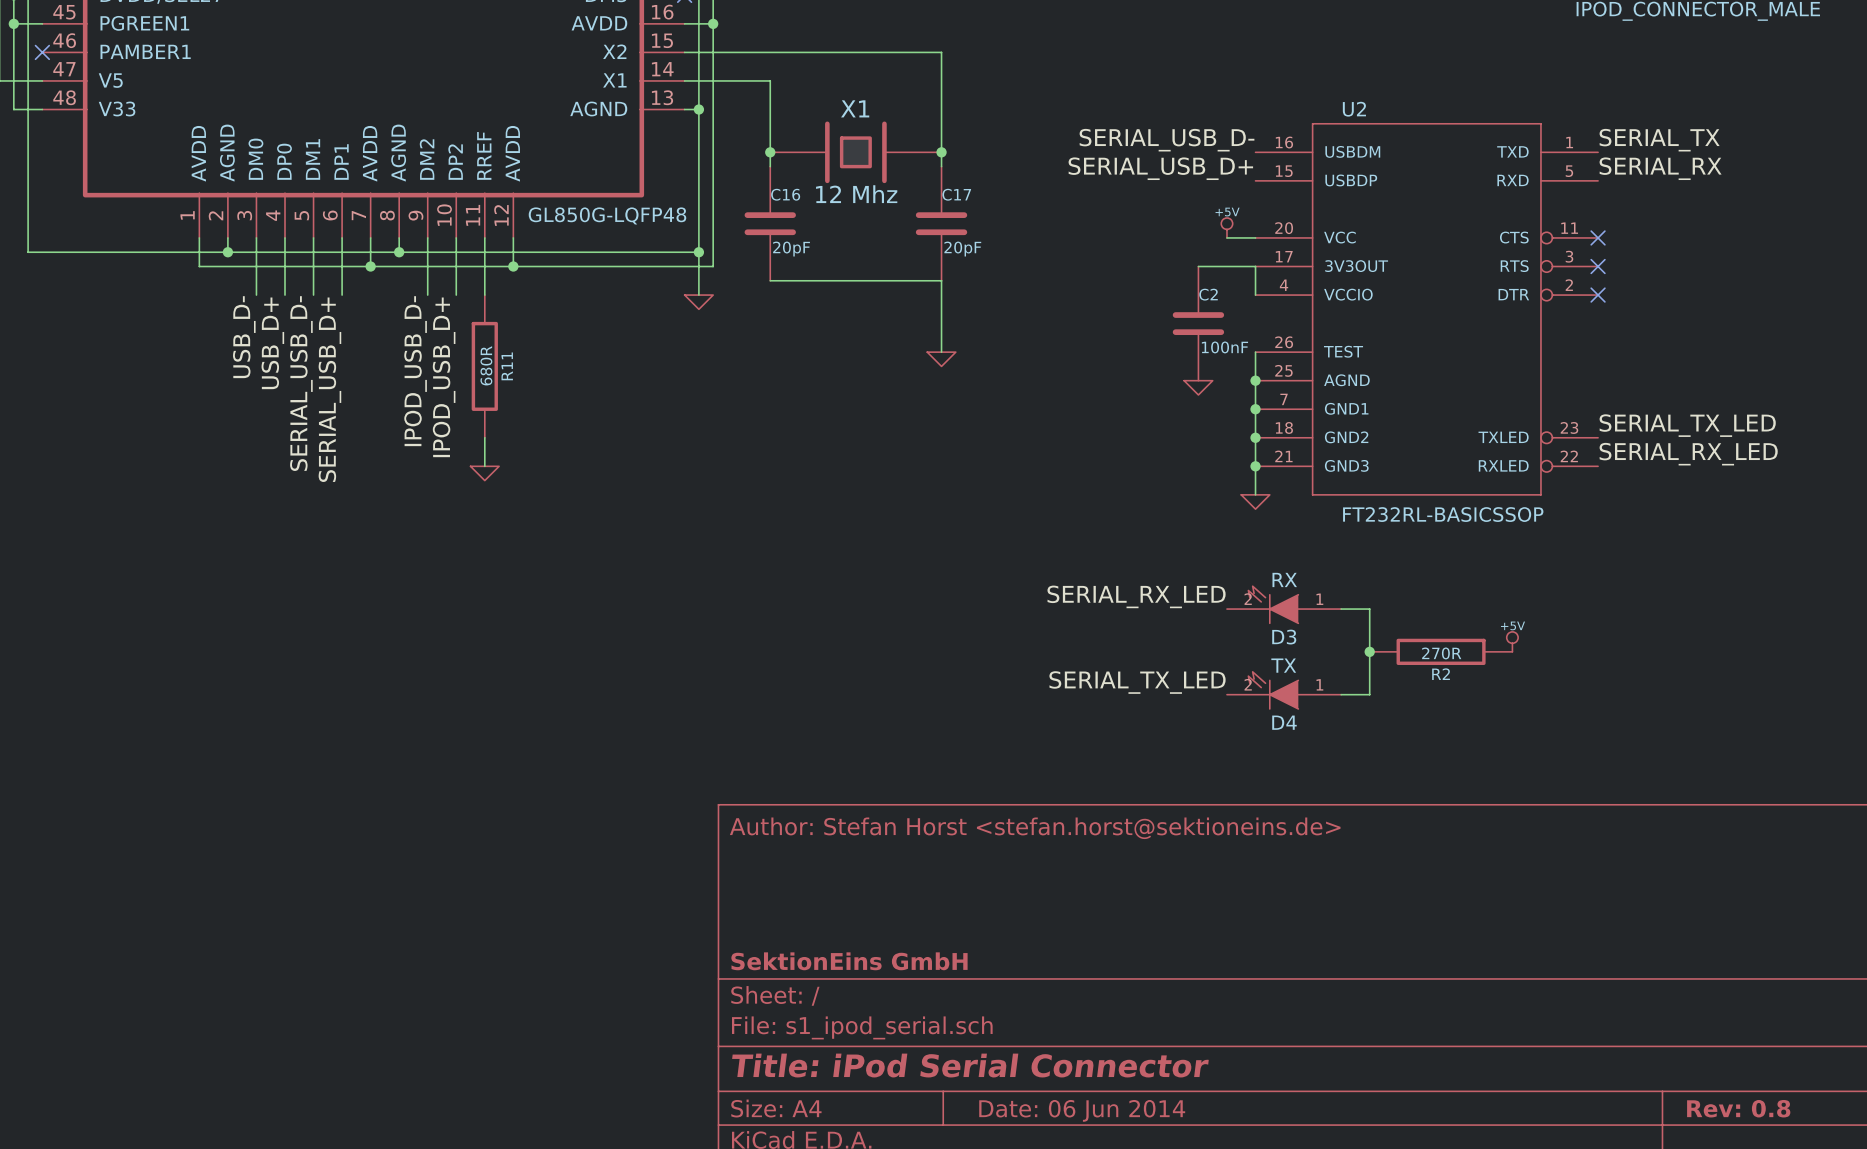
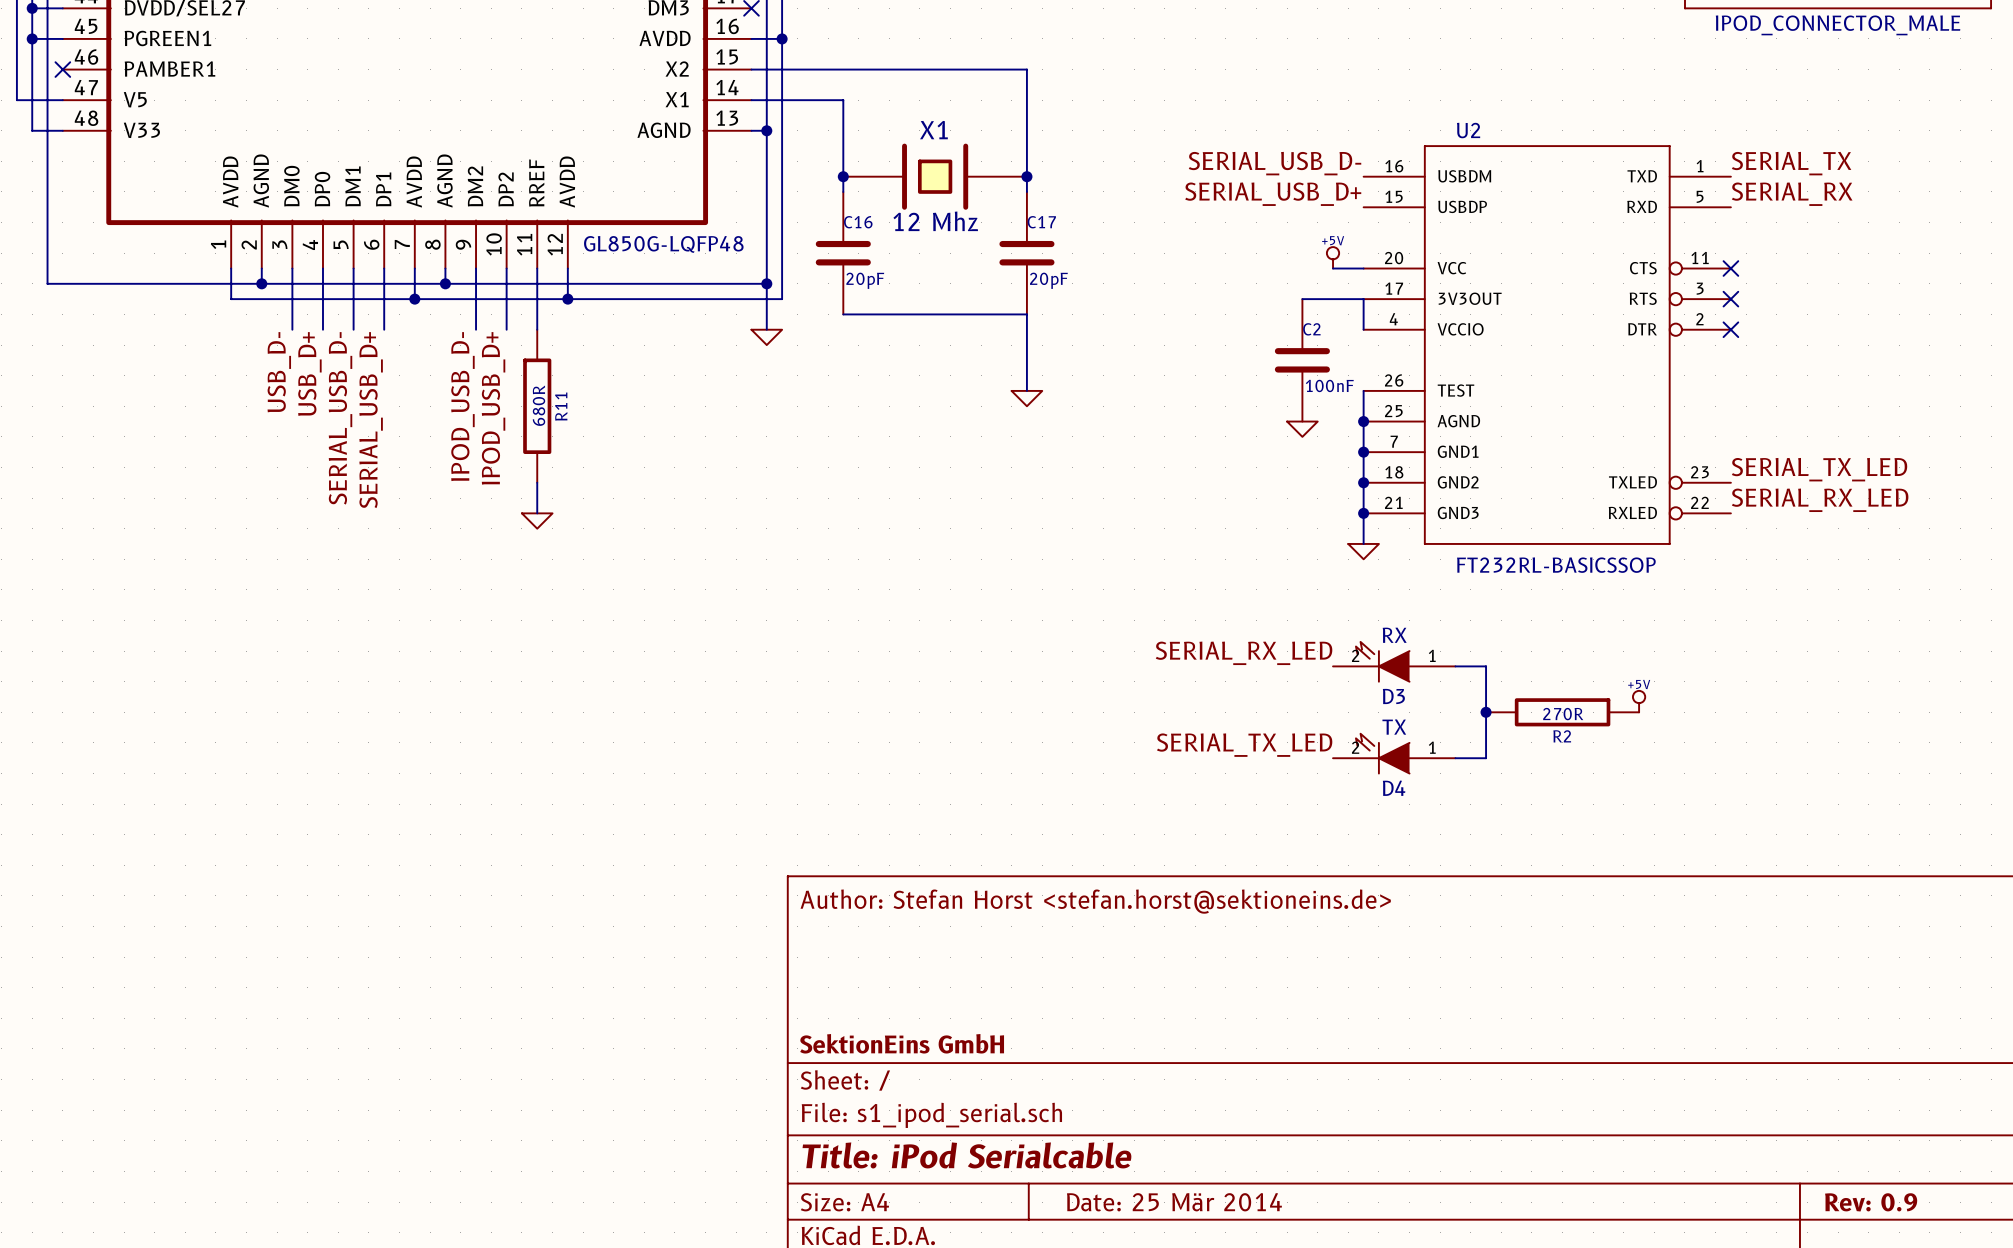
title block: Title: iPod Serial Connector (970, 1065) -> Title: iPod Serialcable (967, 1155)
title block: Rev: 0.8 (1738, 1108) -> Rev: 0.9 (1871, 1202)
title block: Date: 06 Jun 2014 (1082, 1110) -> Date: 25 Mär 2014 (1174, 1202)

